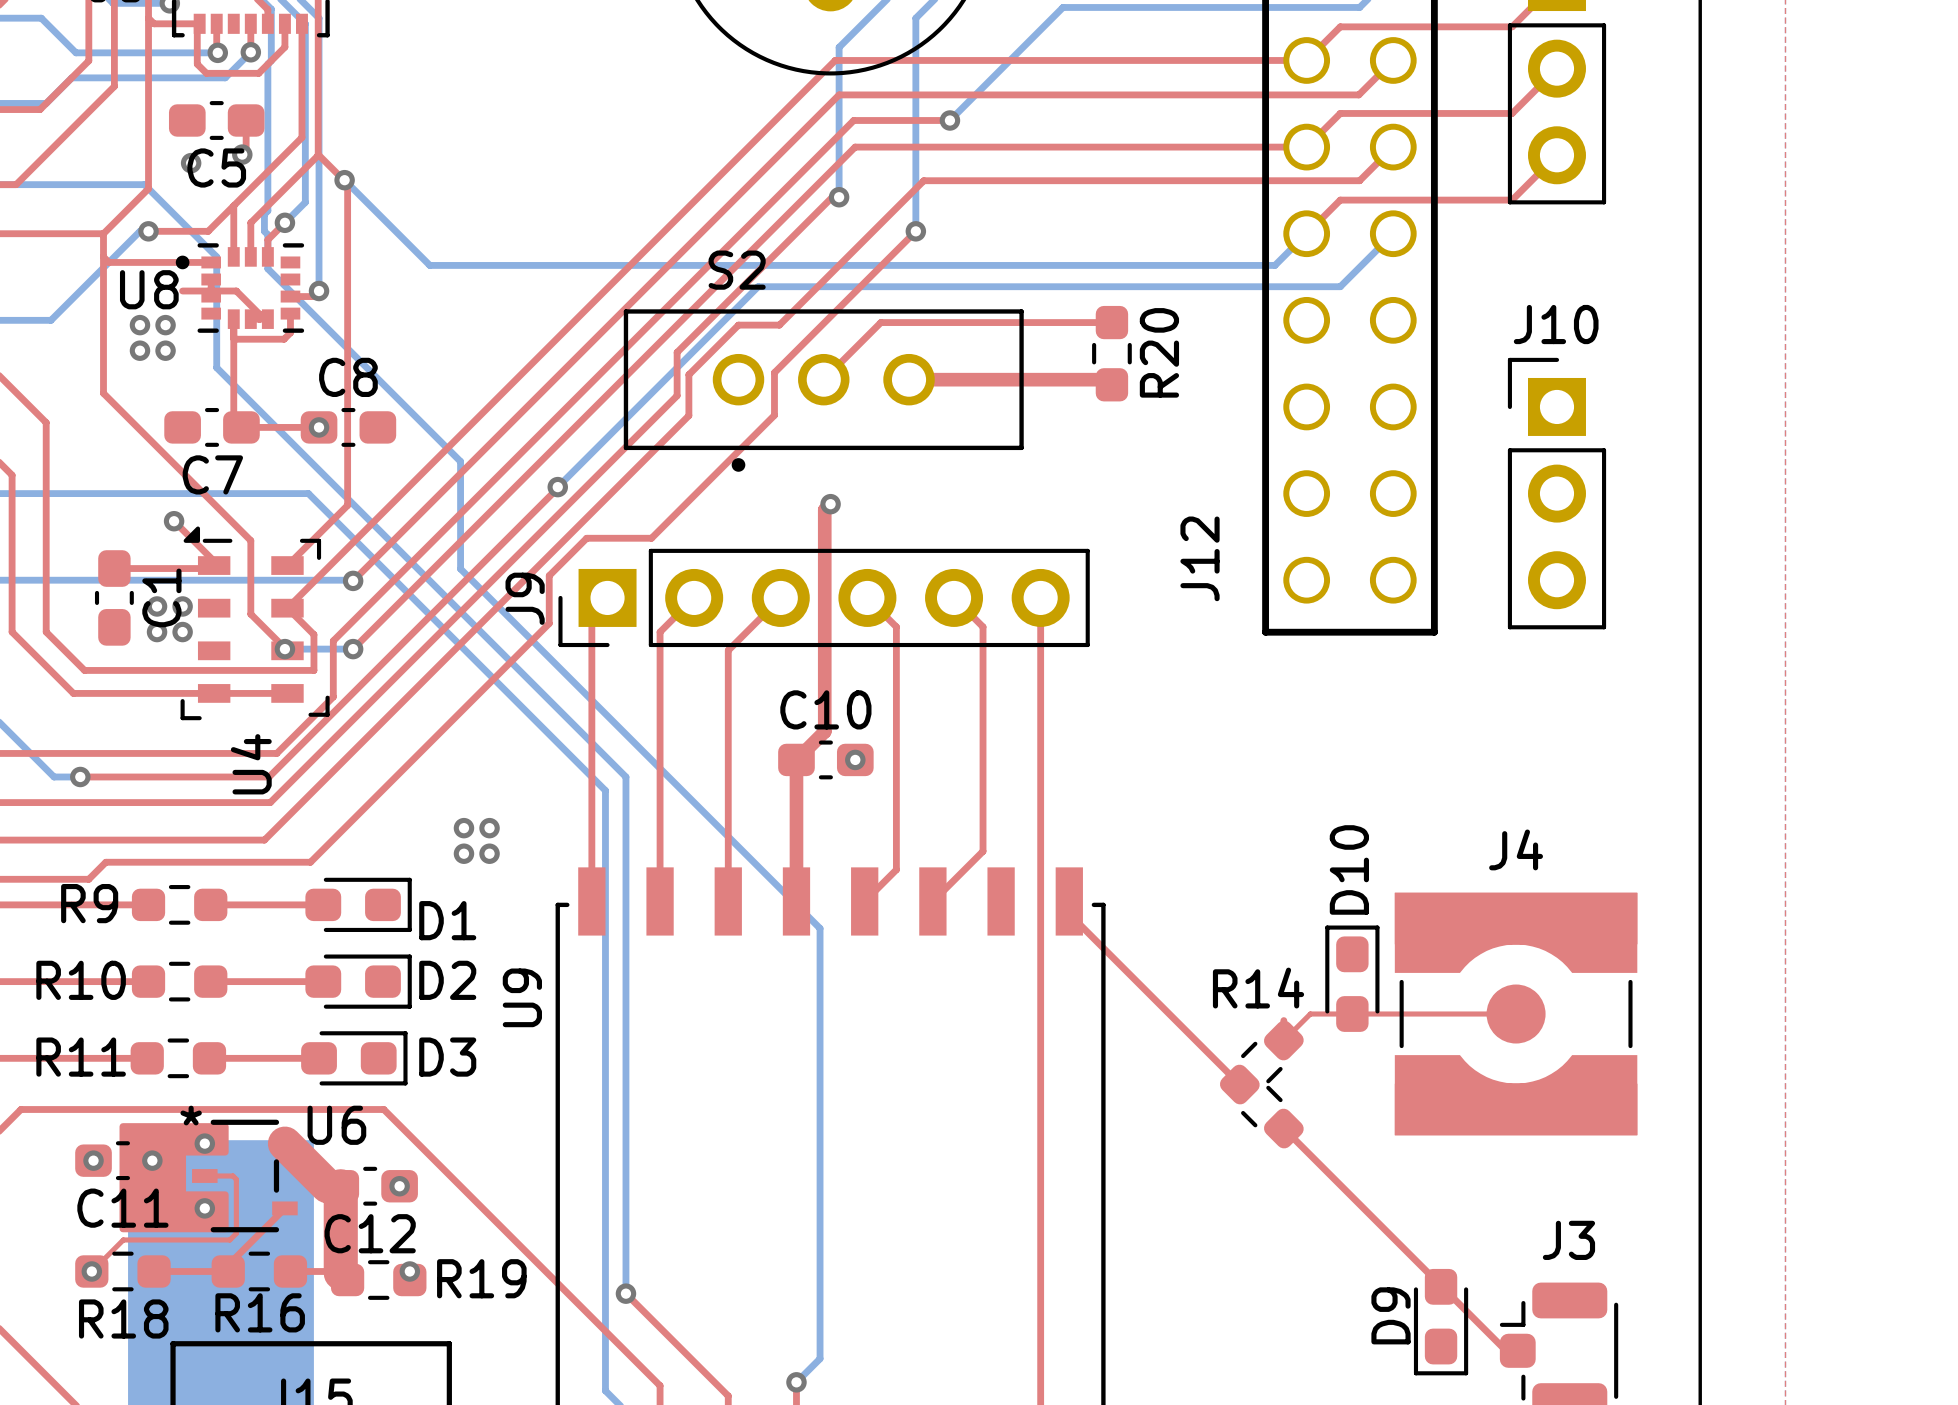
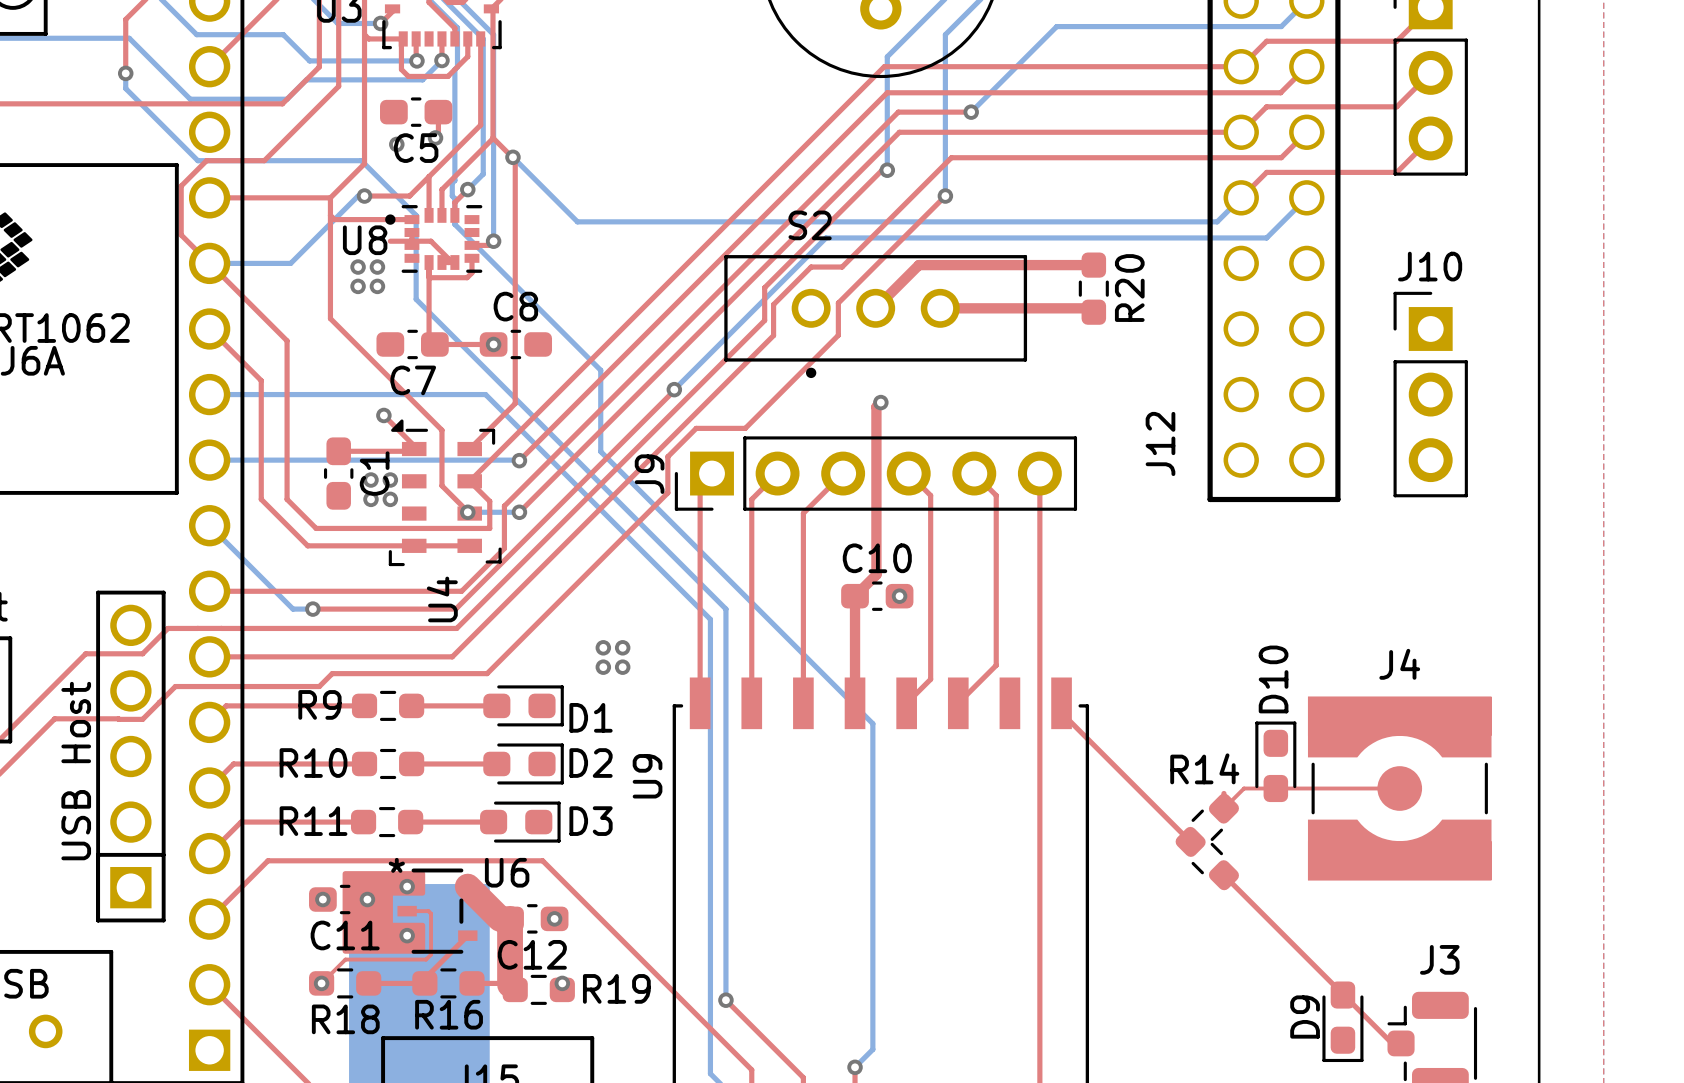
top track width: thin (1111, 322) (880, 322) (823, 379) -> thick (1093, 265) (918, 265) (875, 308)

